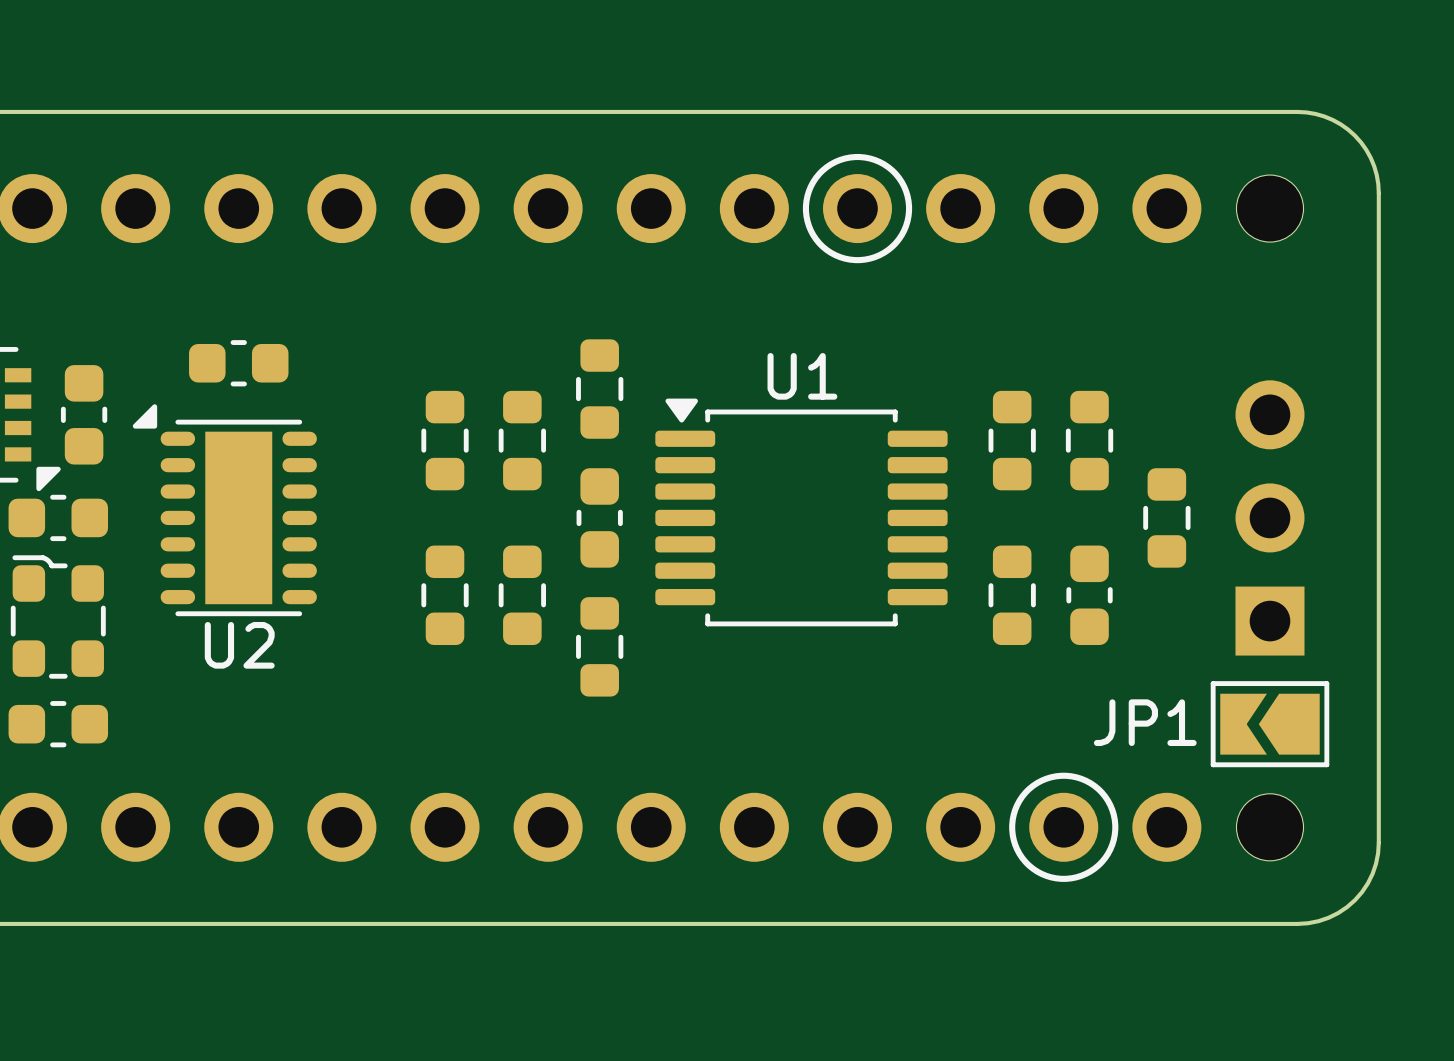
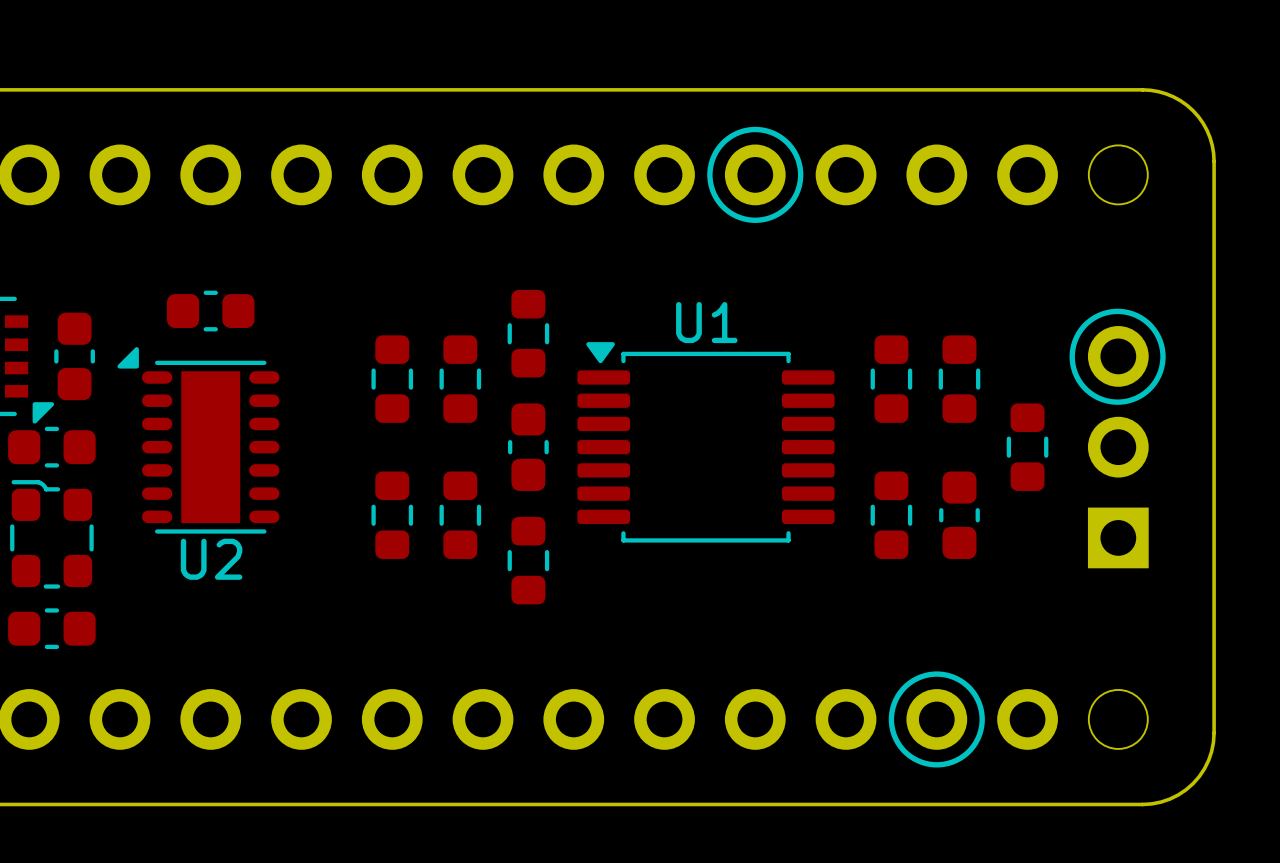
drawing: none -> [1069, 308, 1166, 405]
JP1: (1269, 724) -> none

